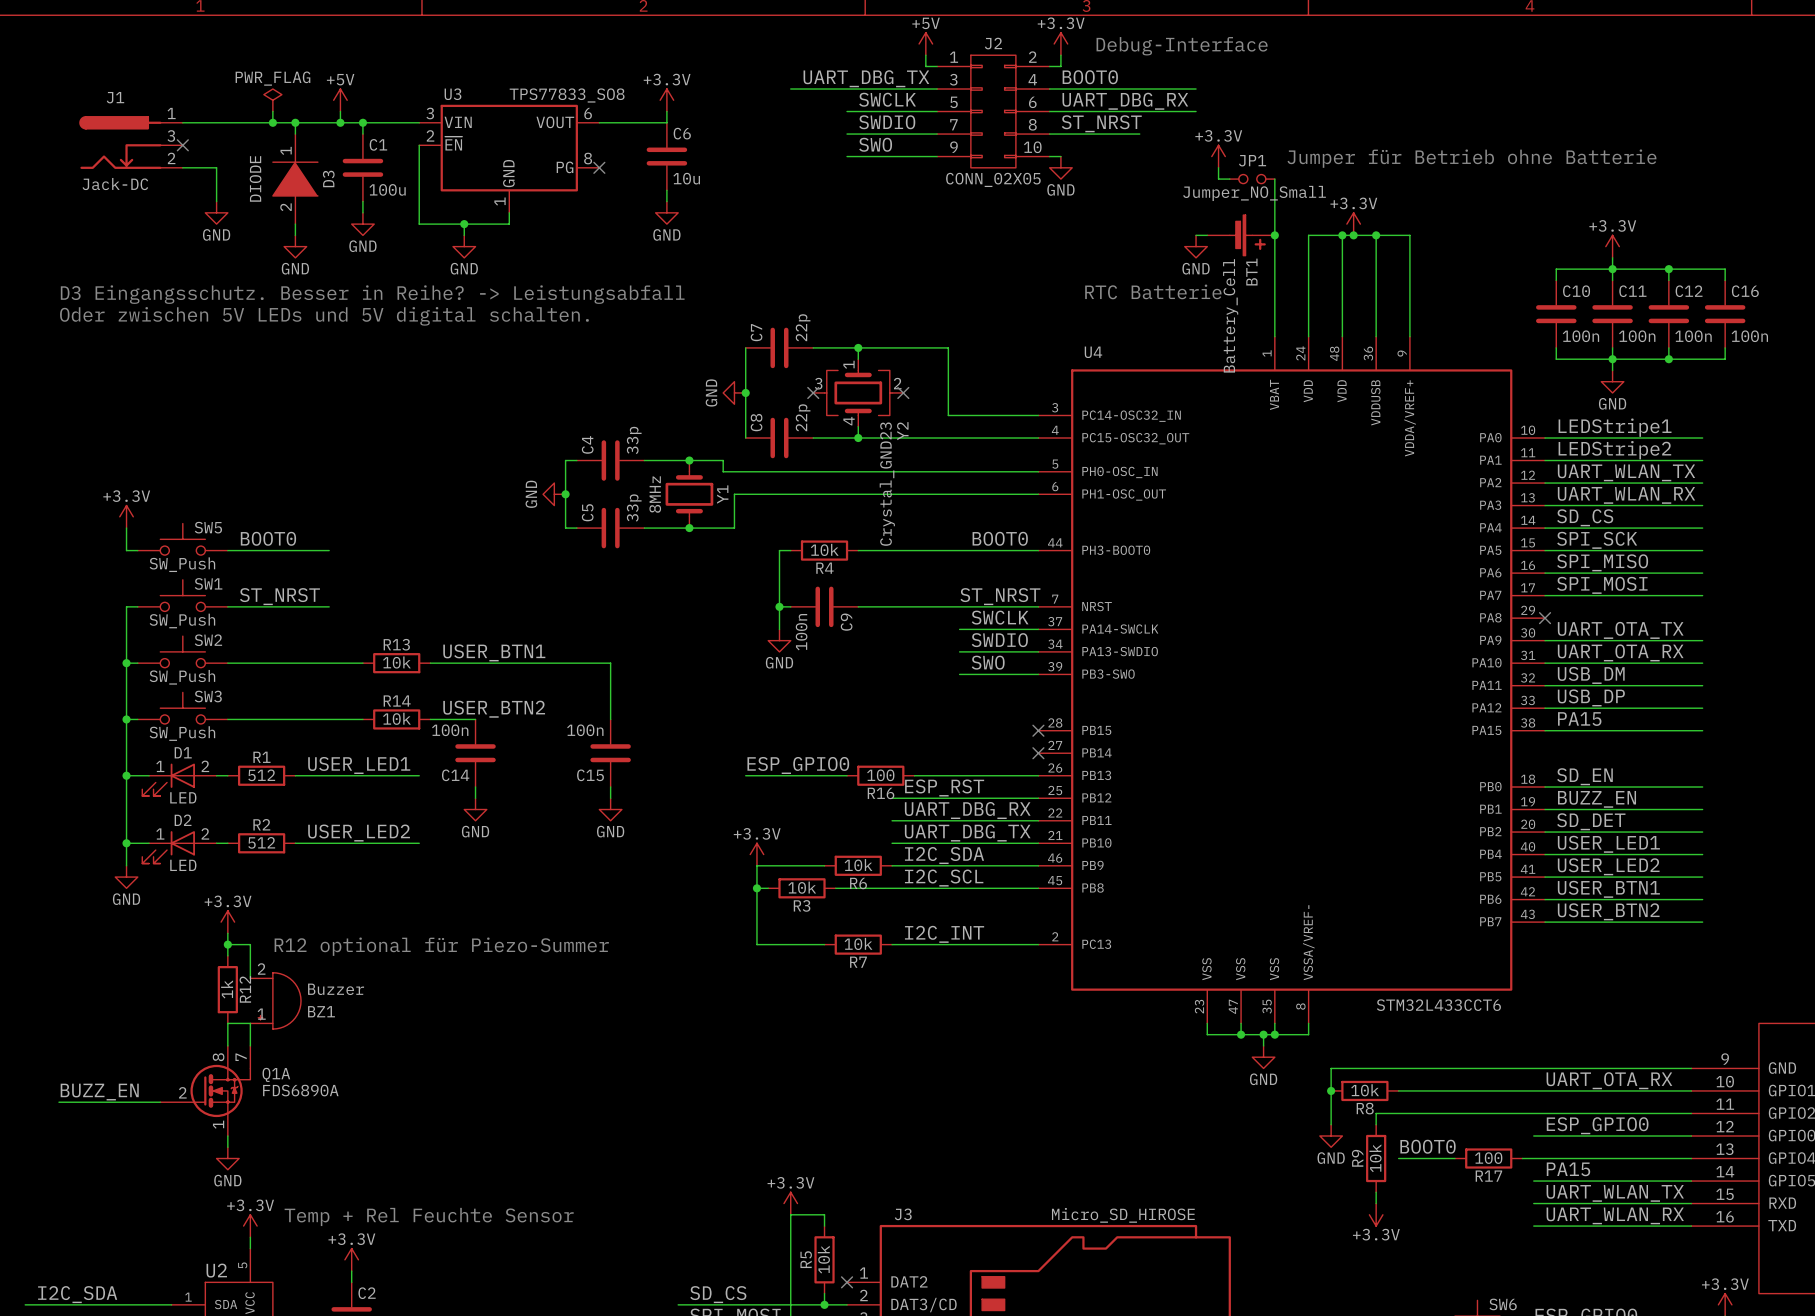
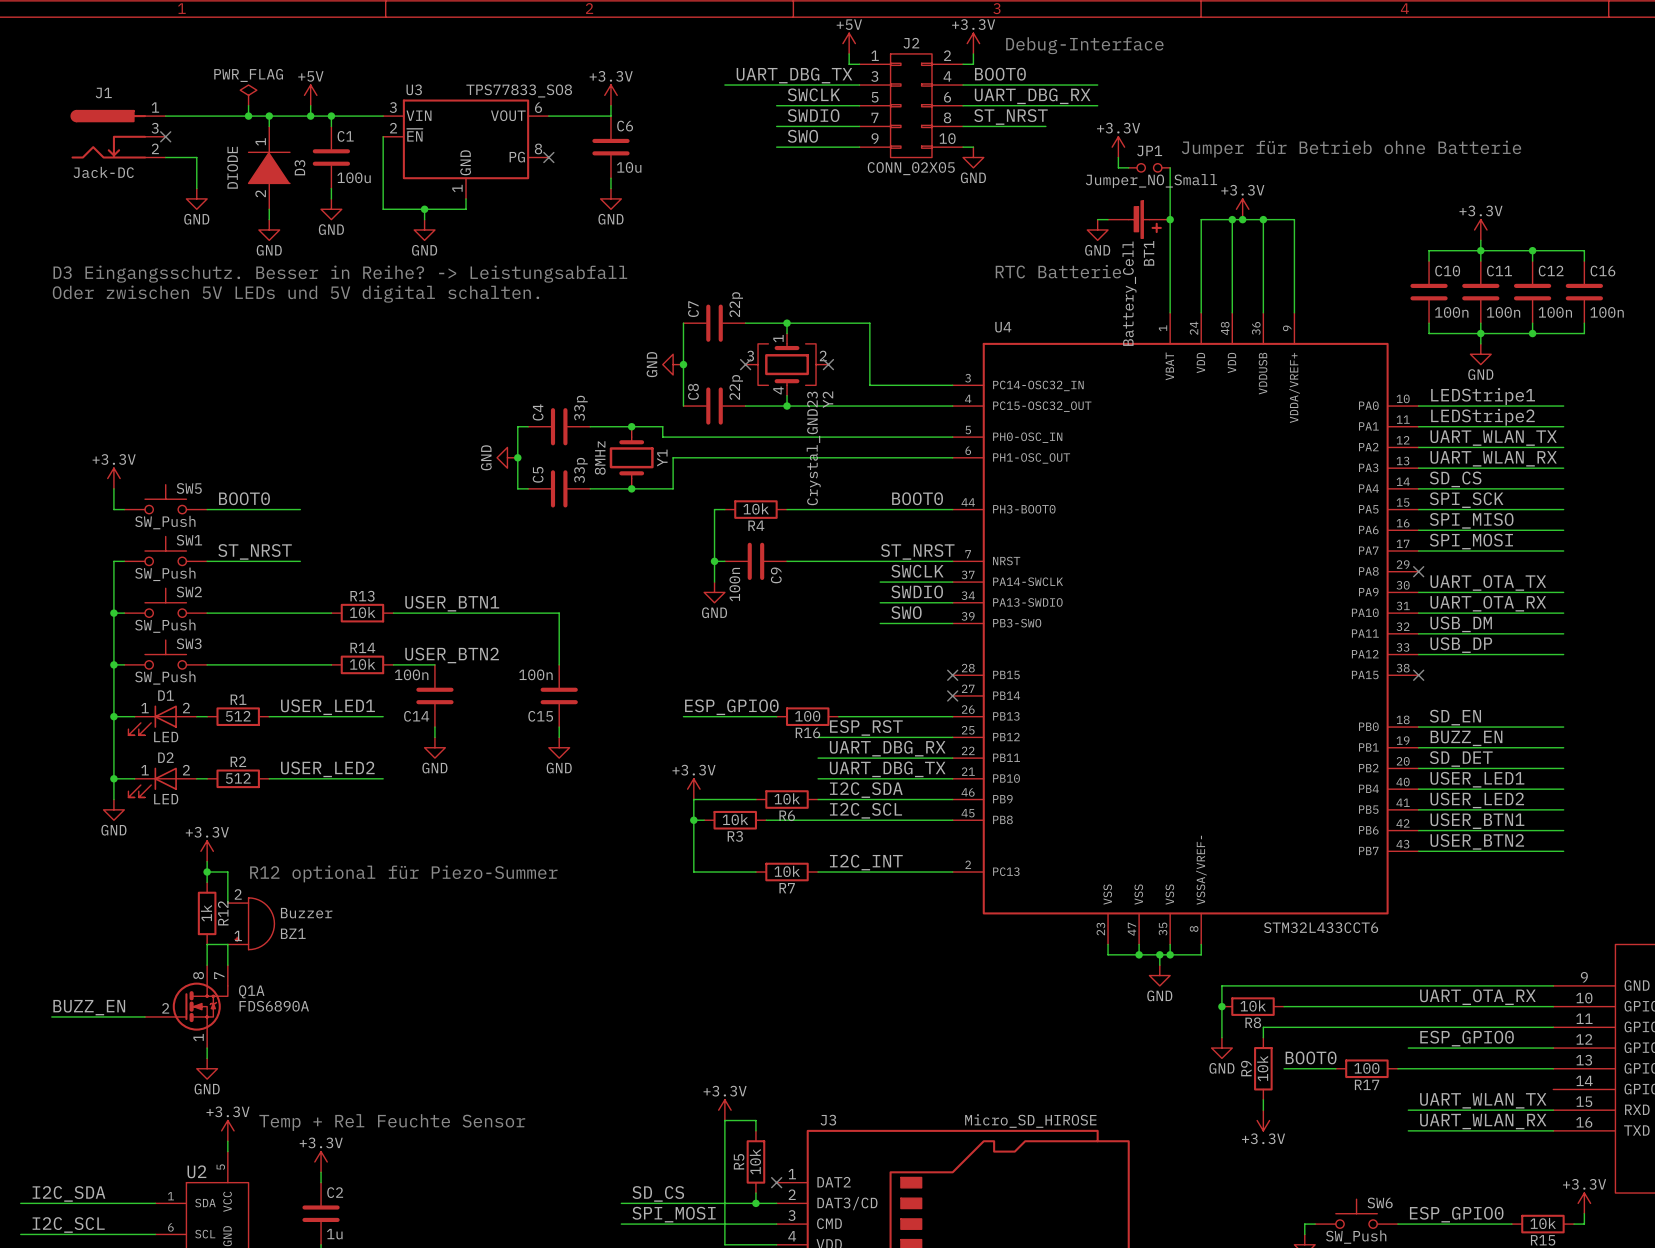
label: PA15 (1579, 719) -> none
wire: (1545, 730) (1702, 730) -> none
no-connect mark: none -> (1418, 675)
label: PA15 (1568, 1169) -> none
wire: (1533, 1181) (1691, 1181) -> none

